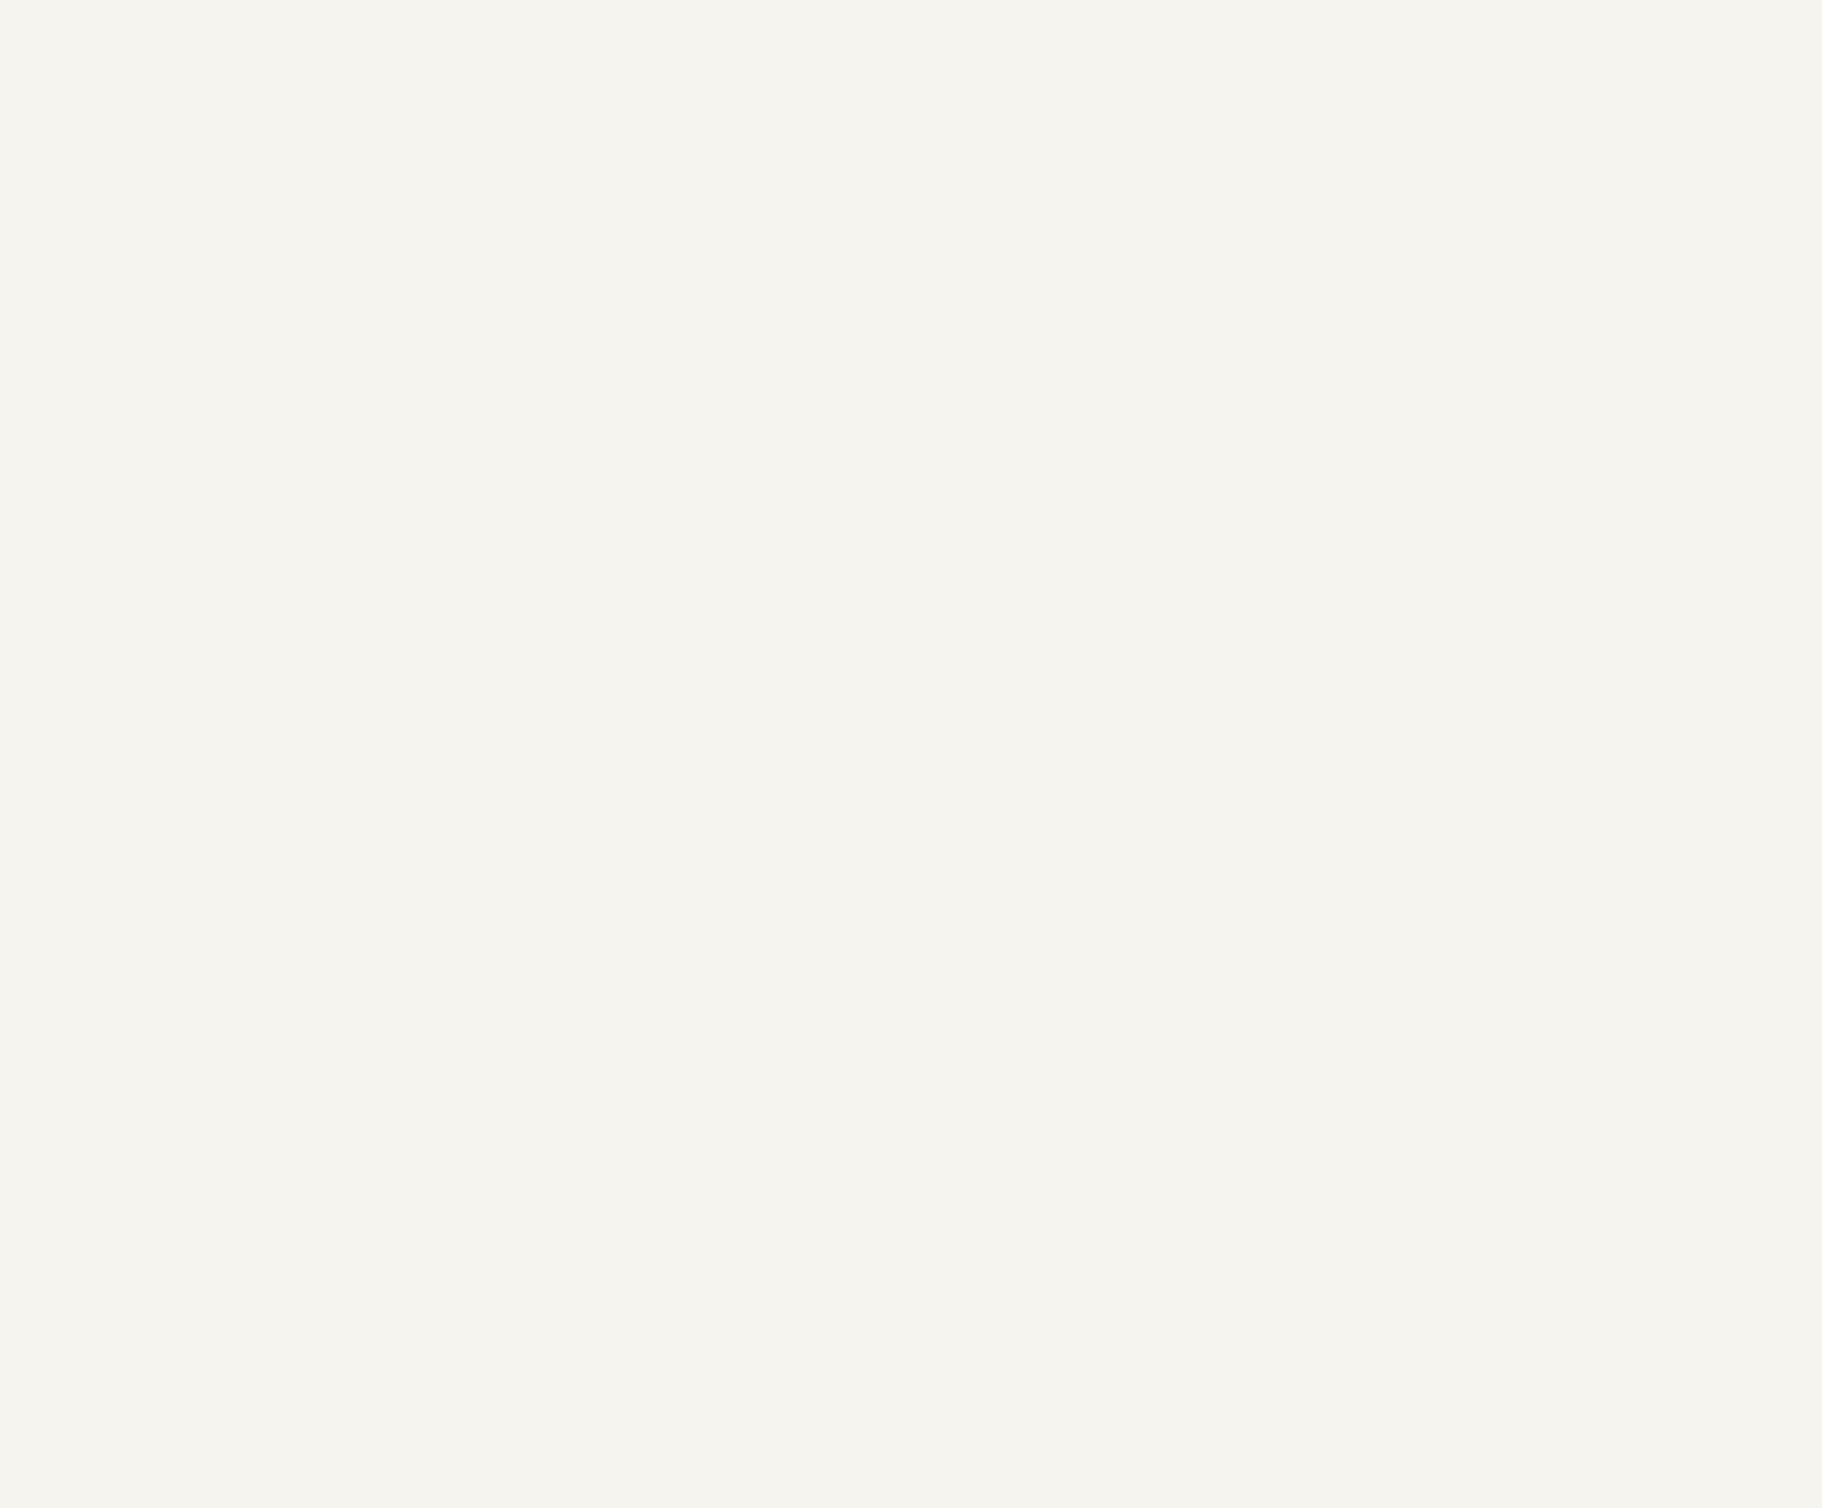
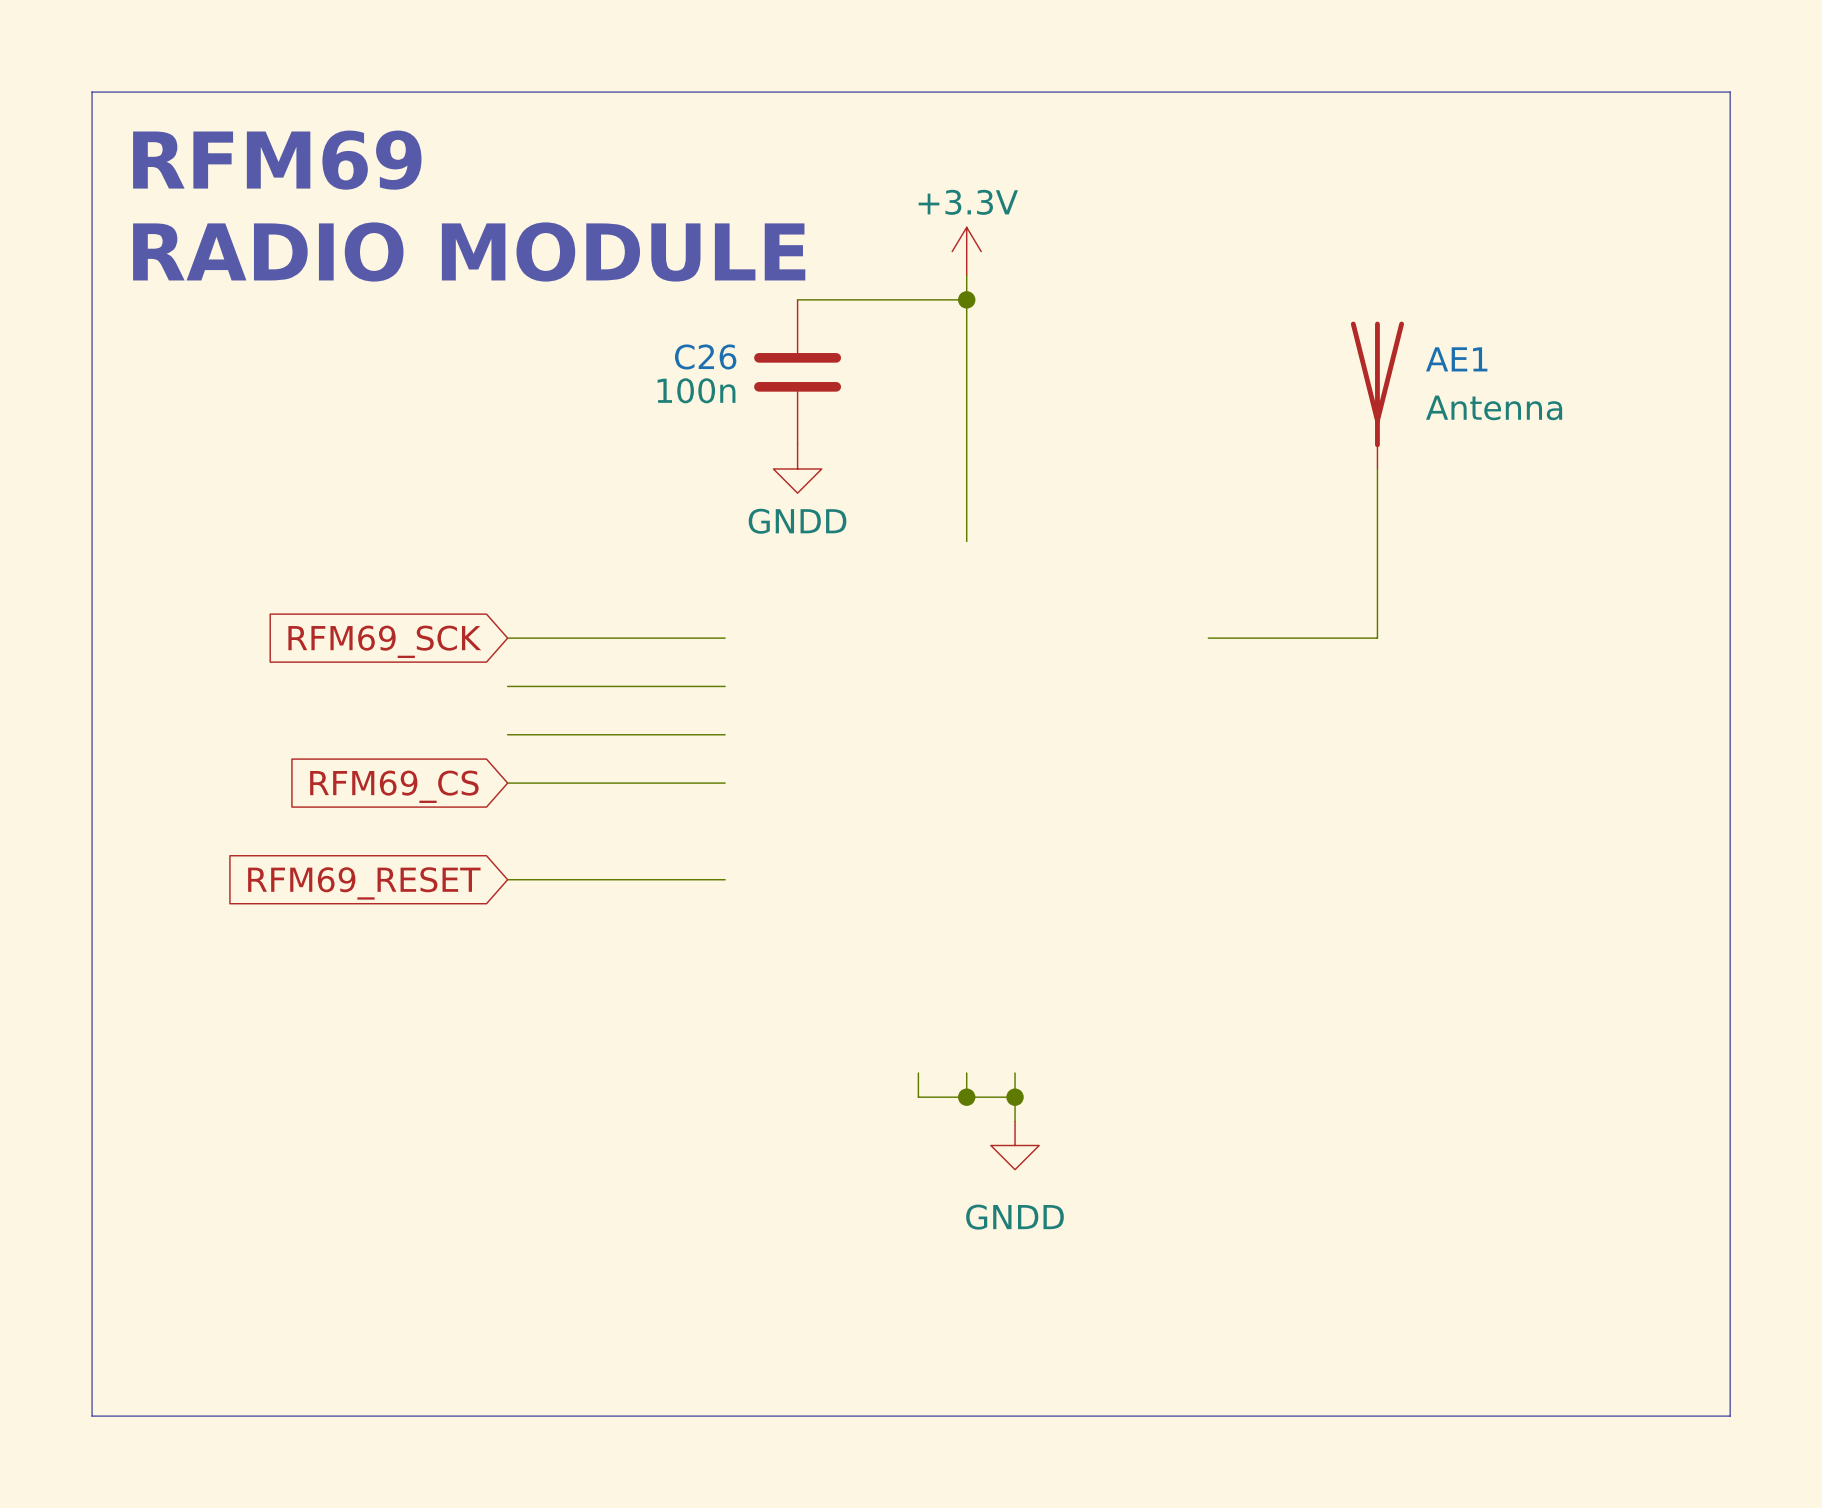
line: none -> (92, 92) (1730, 92) (1730, 1416) (92, 1416) (92, 92)
text: none -> RFM69 (277, 160)
text: none -> RADIO MODULE (469, 251)
power symbol: none -> +3.3V (966, 251)
wire: none -> (966, 275) (966, 541)
wire: none -> (797, 299) (966, 299)
junction: none -> (966, 299)
C26: none -> 100n (797, 372)
AE1: none -> Antenna (1377, 395)
power symbol: none -> GNDD (797, 468)
wire: none -> (1377, 468) (1377, 638) (1208, 638)
wire: none -> (507, 638) (725, 638)
global label: none -> RFM69_SCK (384, 641)
wire: none -> (507, 686) (725, 686)
wire: none -> (507, 734) (725, 734)
wire: none -> (507, 783) (725, 783)
global label: none -> RFM69_CS (394, 786)
wire: none -> (507, 879) (725, 879)
global label: none -> RFM69_RESET (364, 883)
wire: none -> (918, 1073) (918, 1097) (1015, 1097)
wire: none -> (966, 1073) (966, 1097)
wire: none -> (1015, 1073) (1015, 1121)
junction: none -> (966, 1097)
junction: none -> (1015, 1097)
power symbol: none -> GNDD (1015, 1145)

